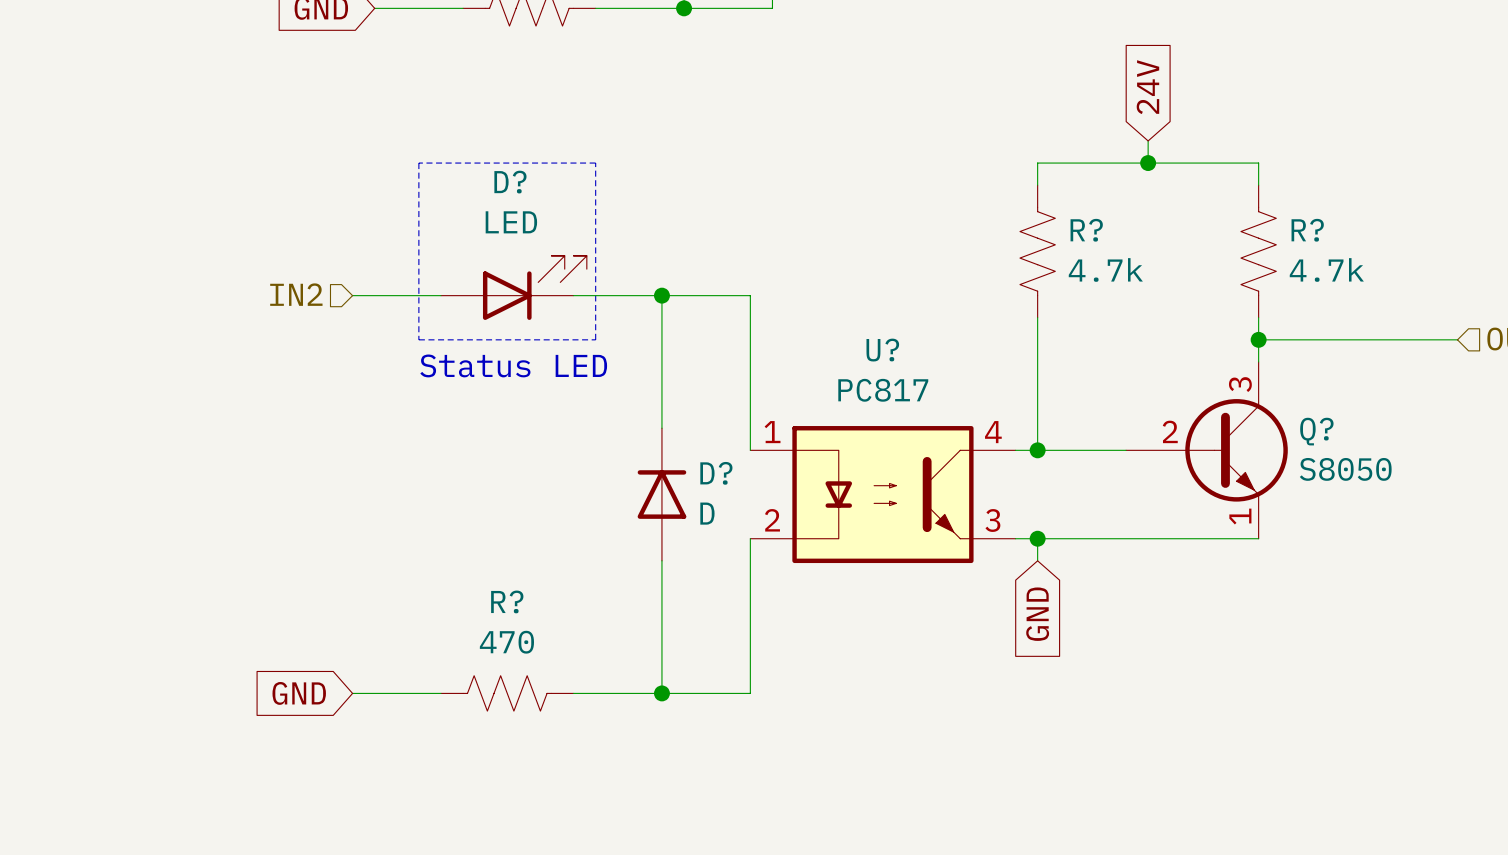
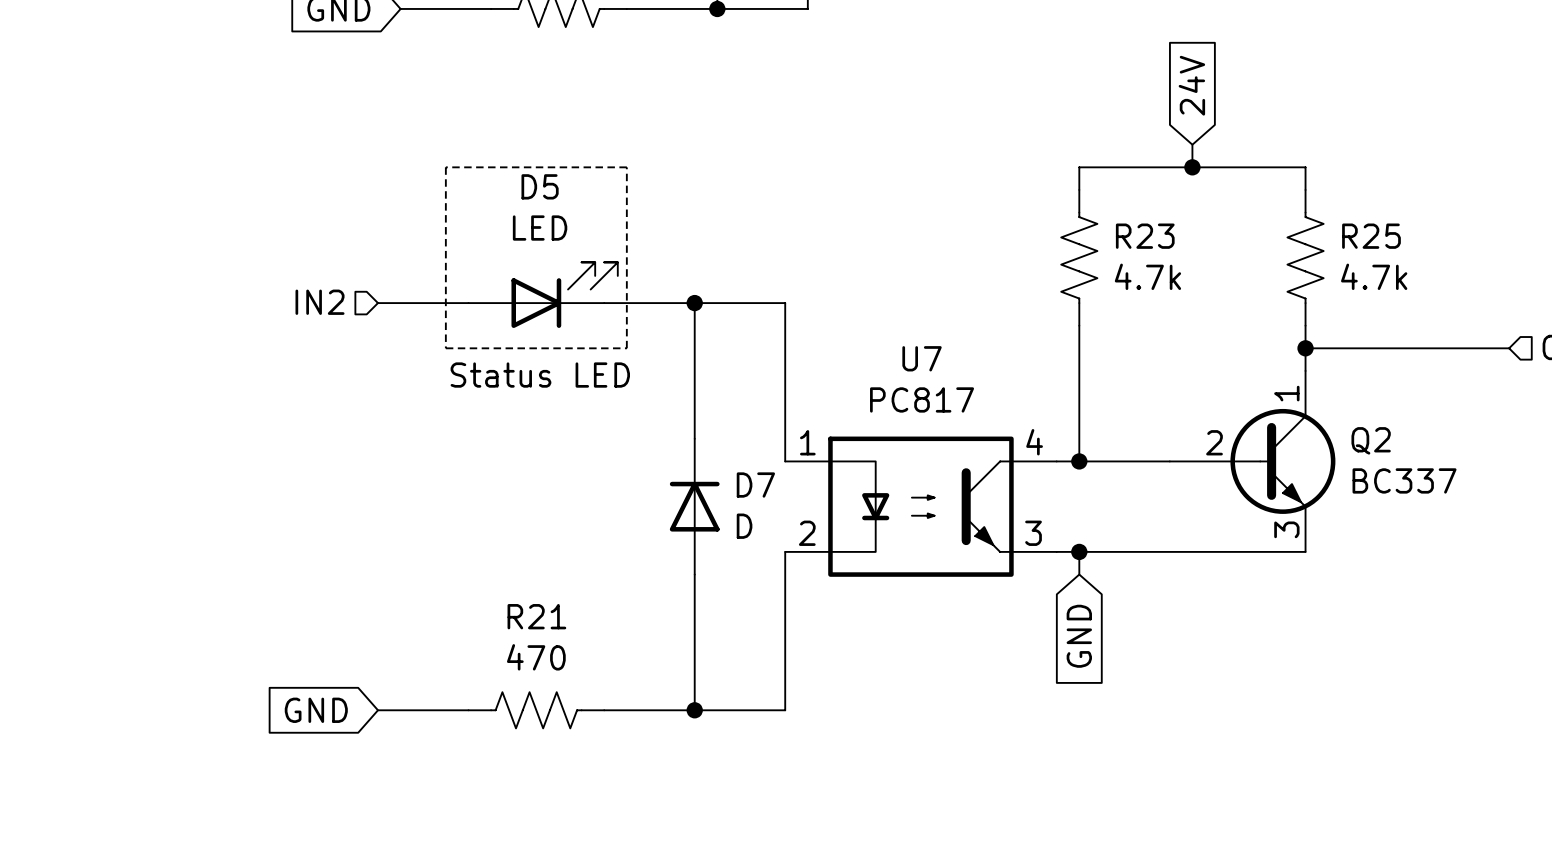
D? name: D? (510, 182) -> D5 (540, 186)
R? name: R? (1086, 230) -> R23 (1145, 236)
R? name: R? (1307, 230) -> R25 (1371, 236)
U? name: U? (882, 350) -> U7 (922, 358)
Q? pin number: 3 (1240, 384) -> 1 (1286, 393)
Q? name: Q? (1316, 431) -> Q2 (1371, 440)
Q? value: S8050 (1345, 469) -> BC337 (1404, 480)
D? name: D? (716, 473) -> D7 (755, 485)
Q? pin number: 1 (1240, 516) -> 3 (1286, 529)
R? name: R? (507, 601) -> R21 (536, 616)

